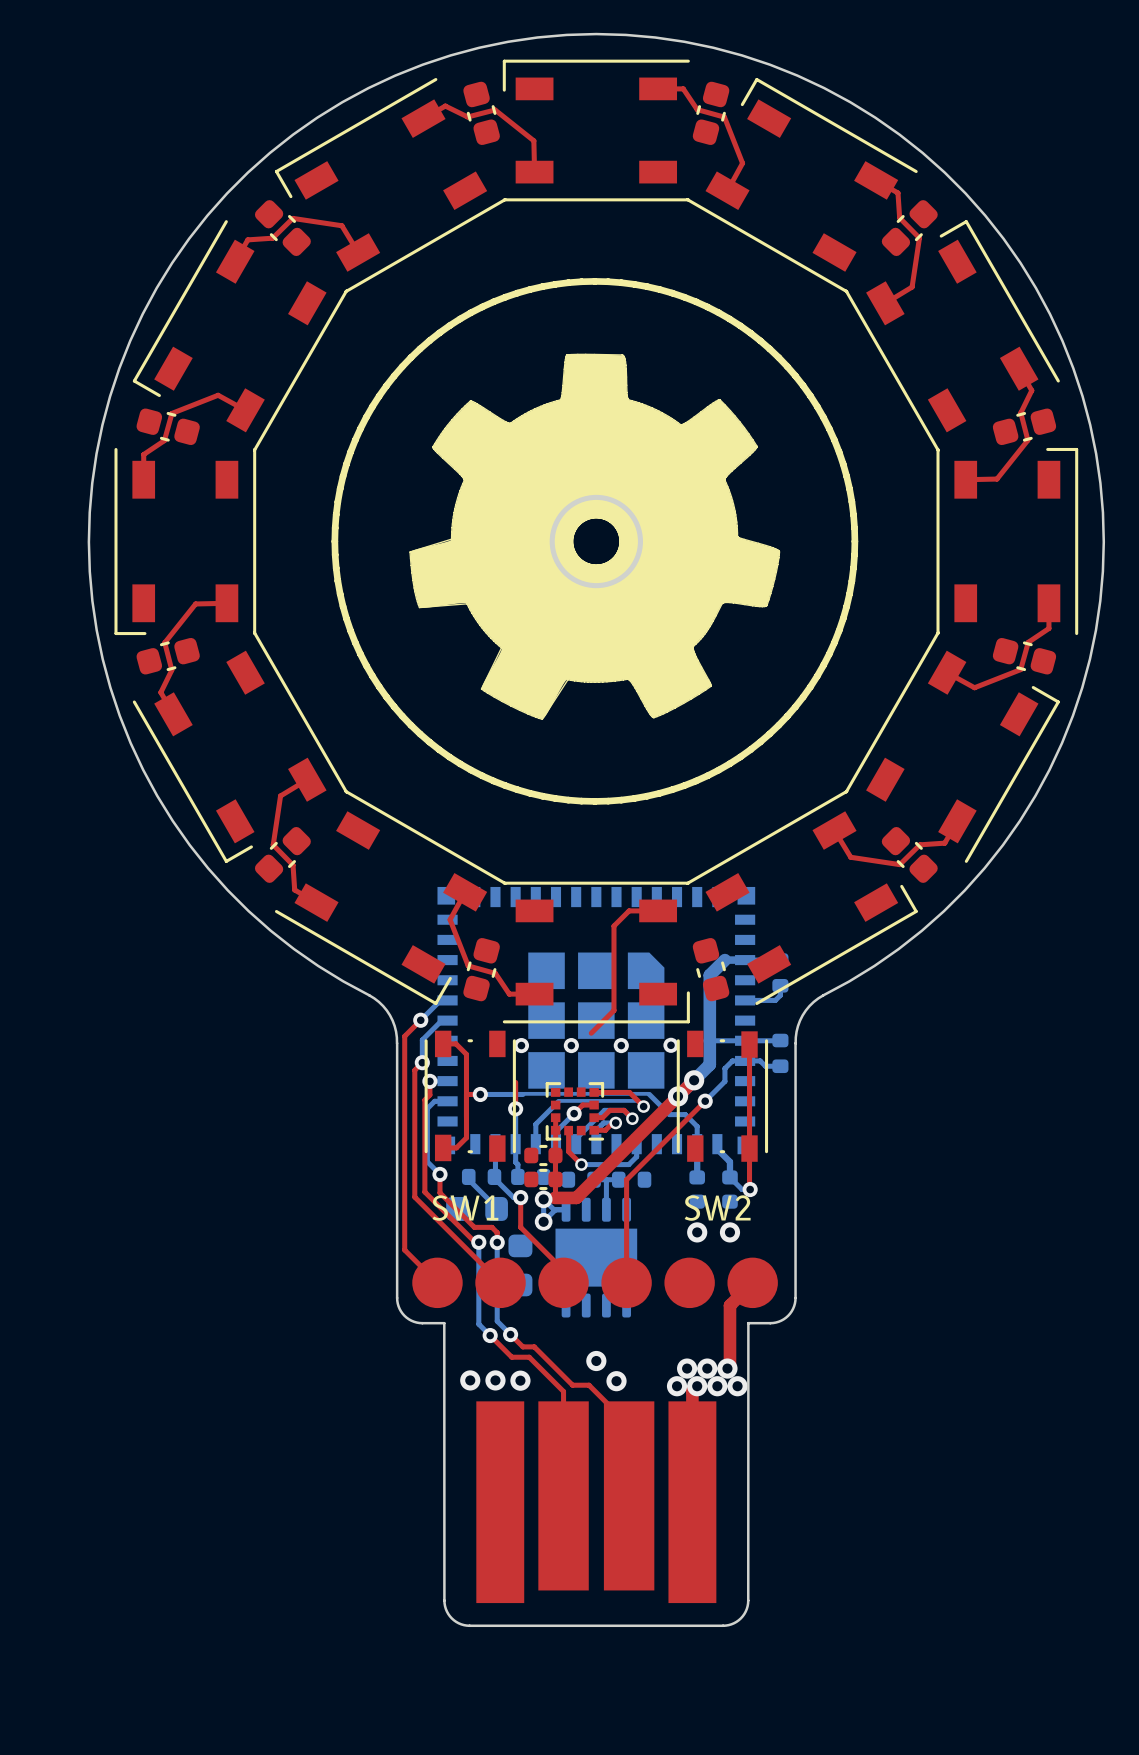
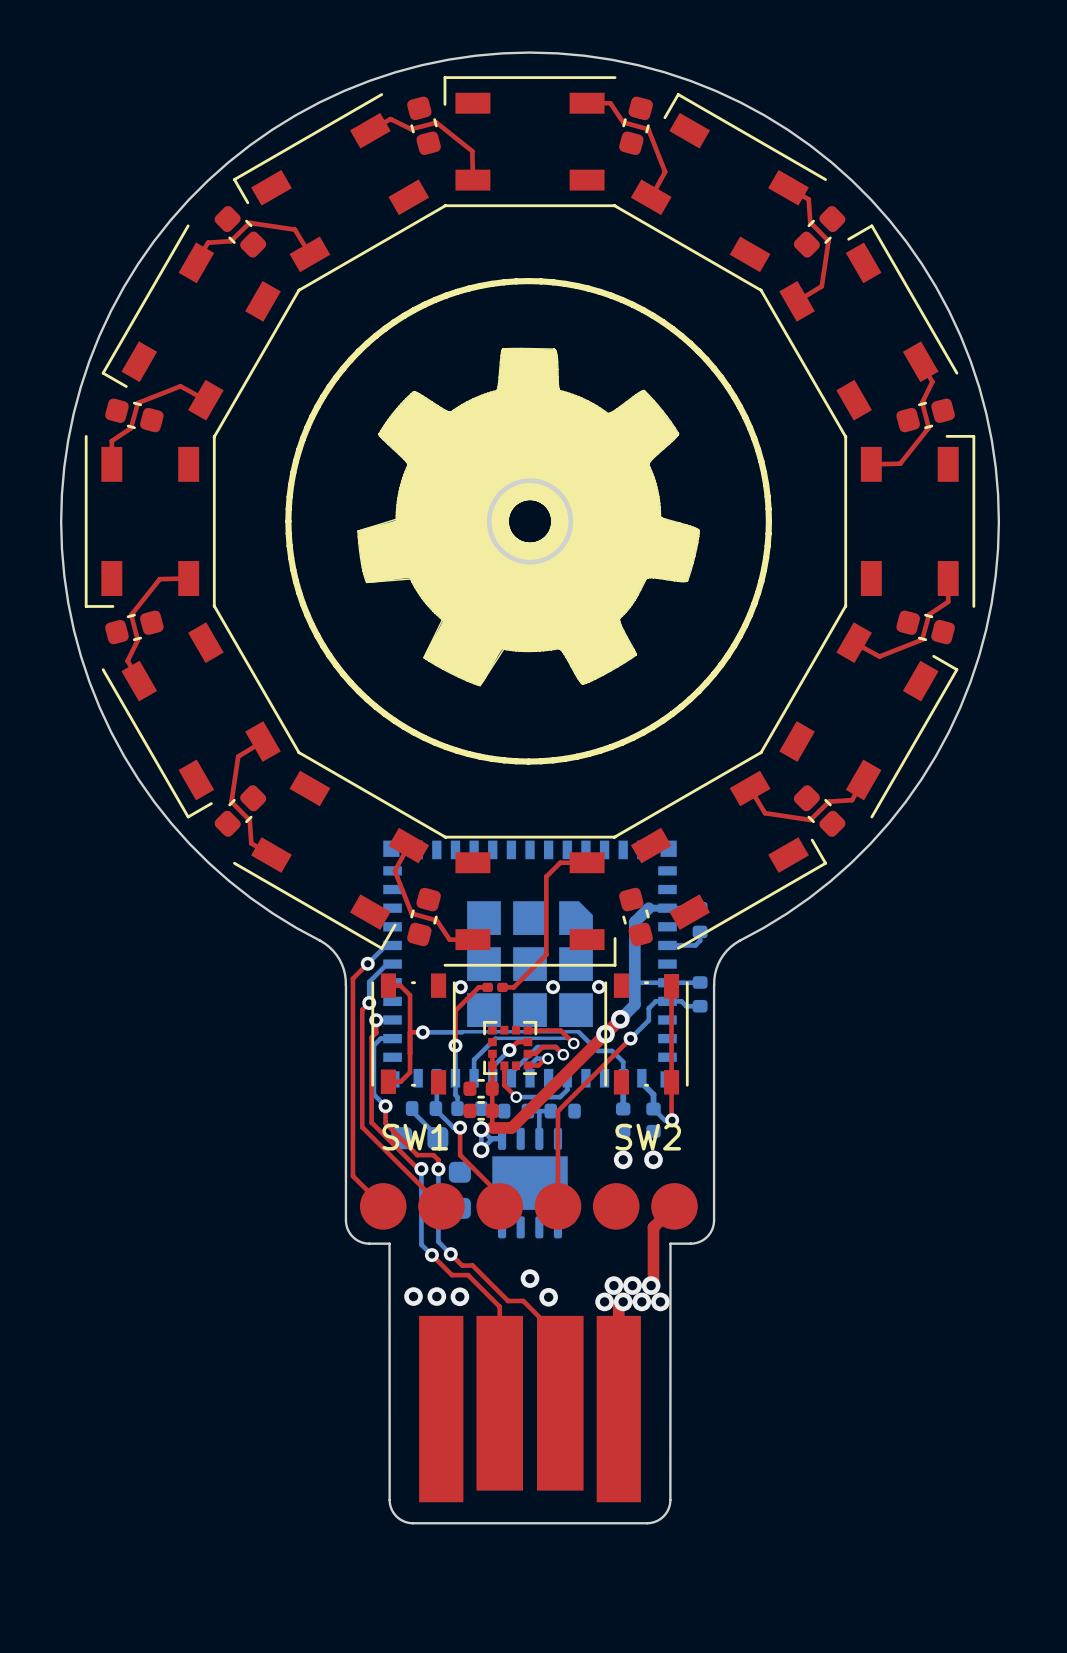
top track: none -> (525, 975) (513, 987) (502, 987)
top track: none -> (487, 987) (478, 987) (455, 1010) (455, 1021)
part: none -> (495, 987)
via: (571, 1045) -> none

